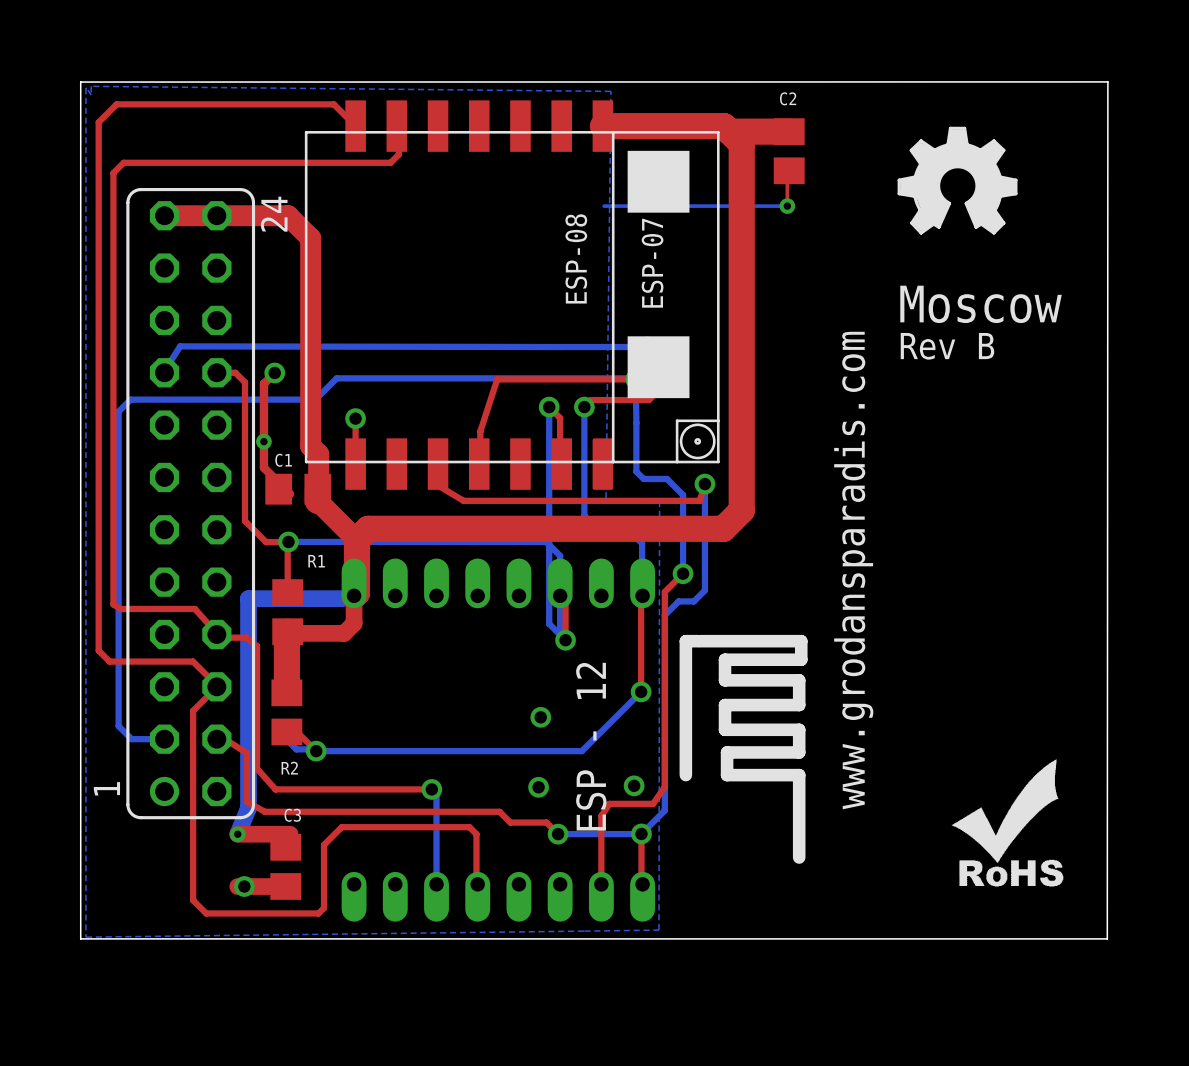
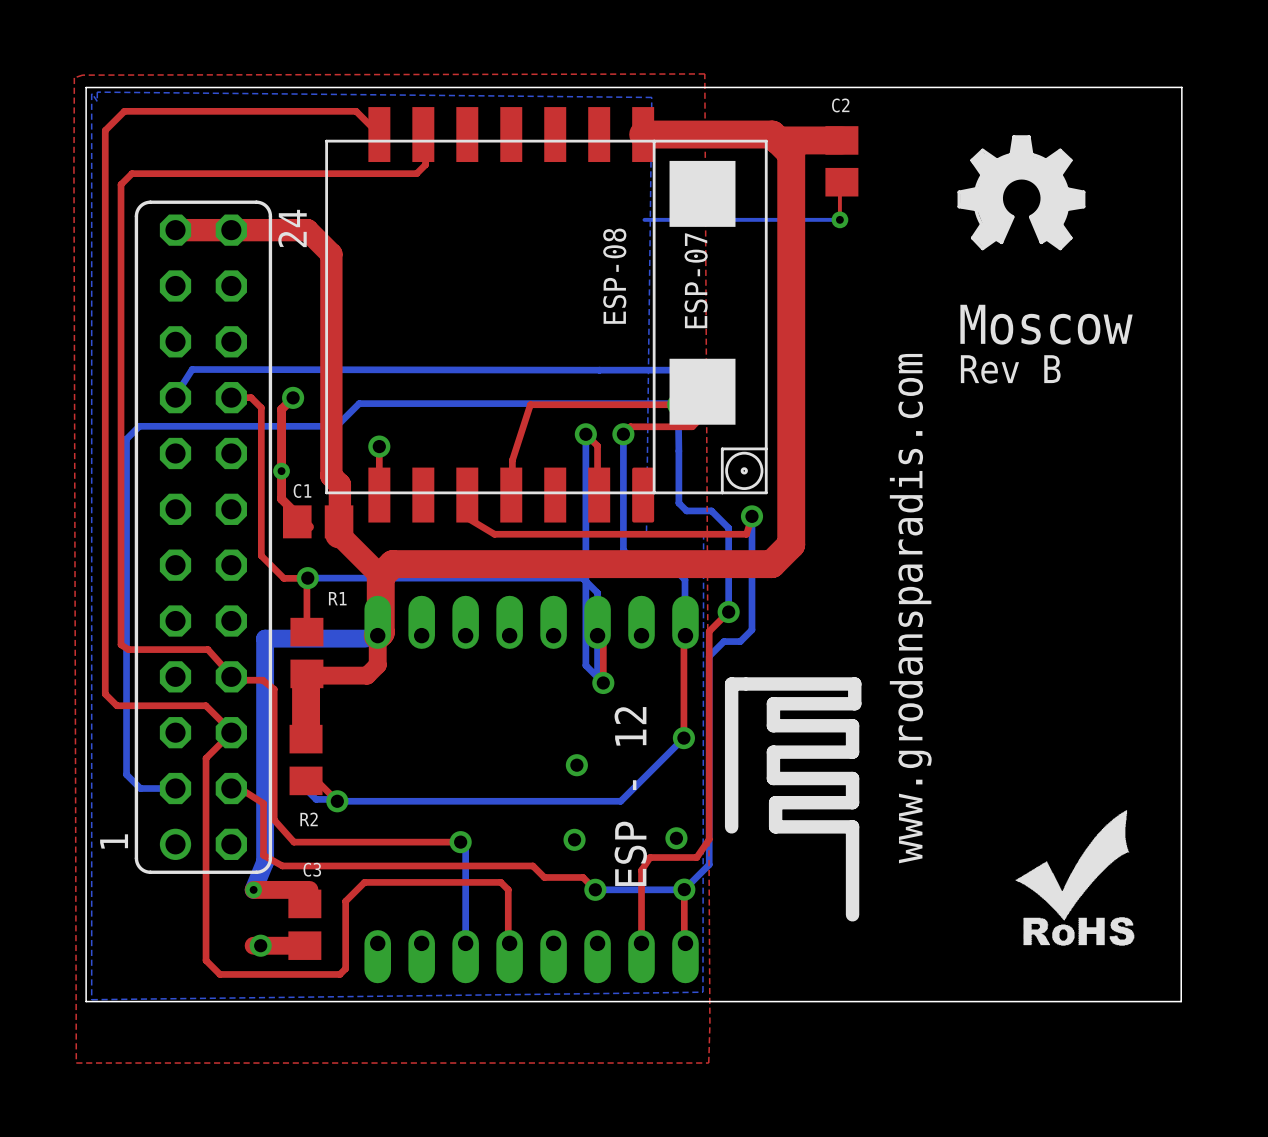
top zone outline: none -> (704, 73) (708, 1063) (76, 1063) (74, 77) (82, 75) (704, 73)

